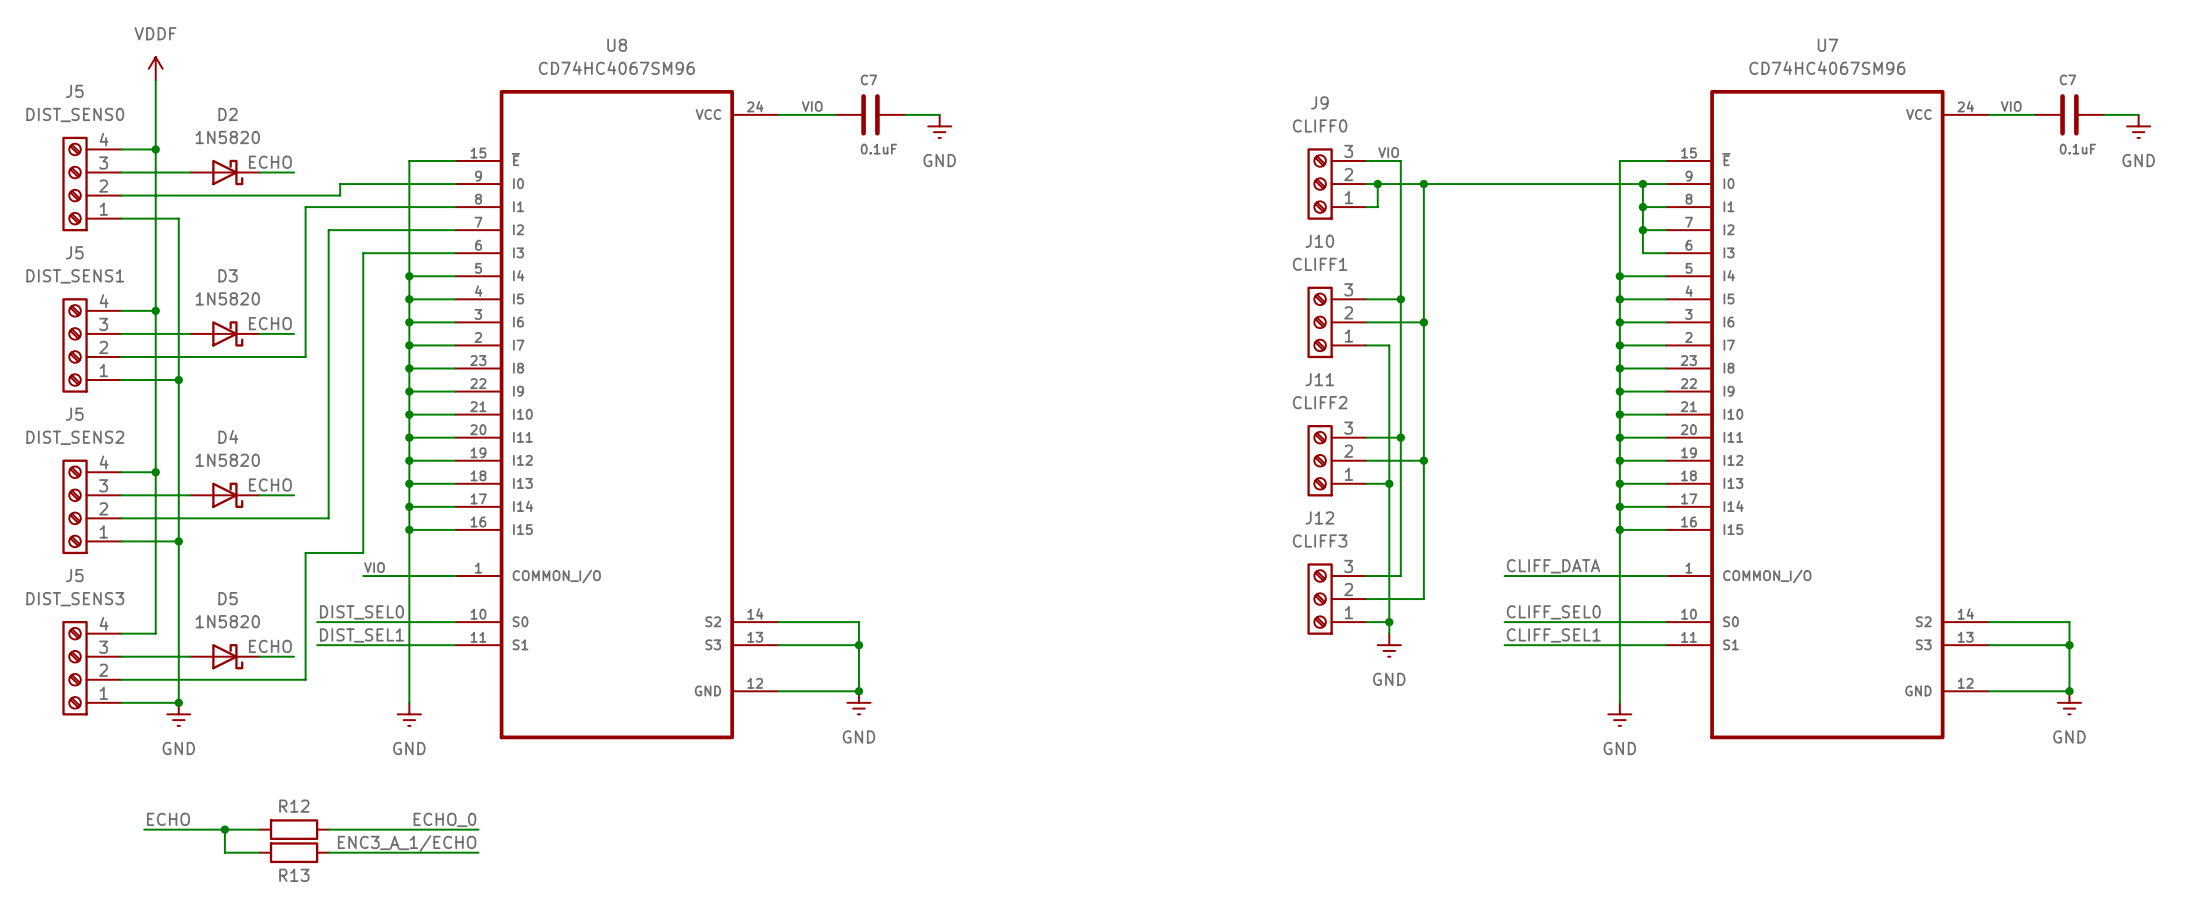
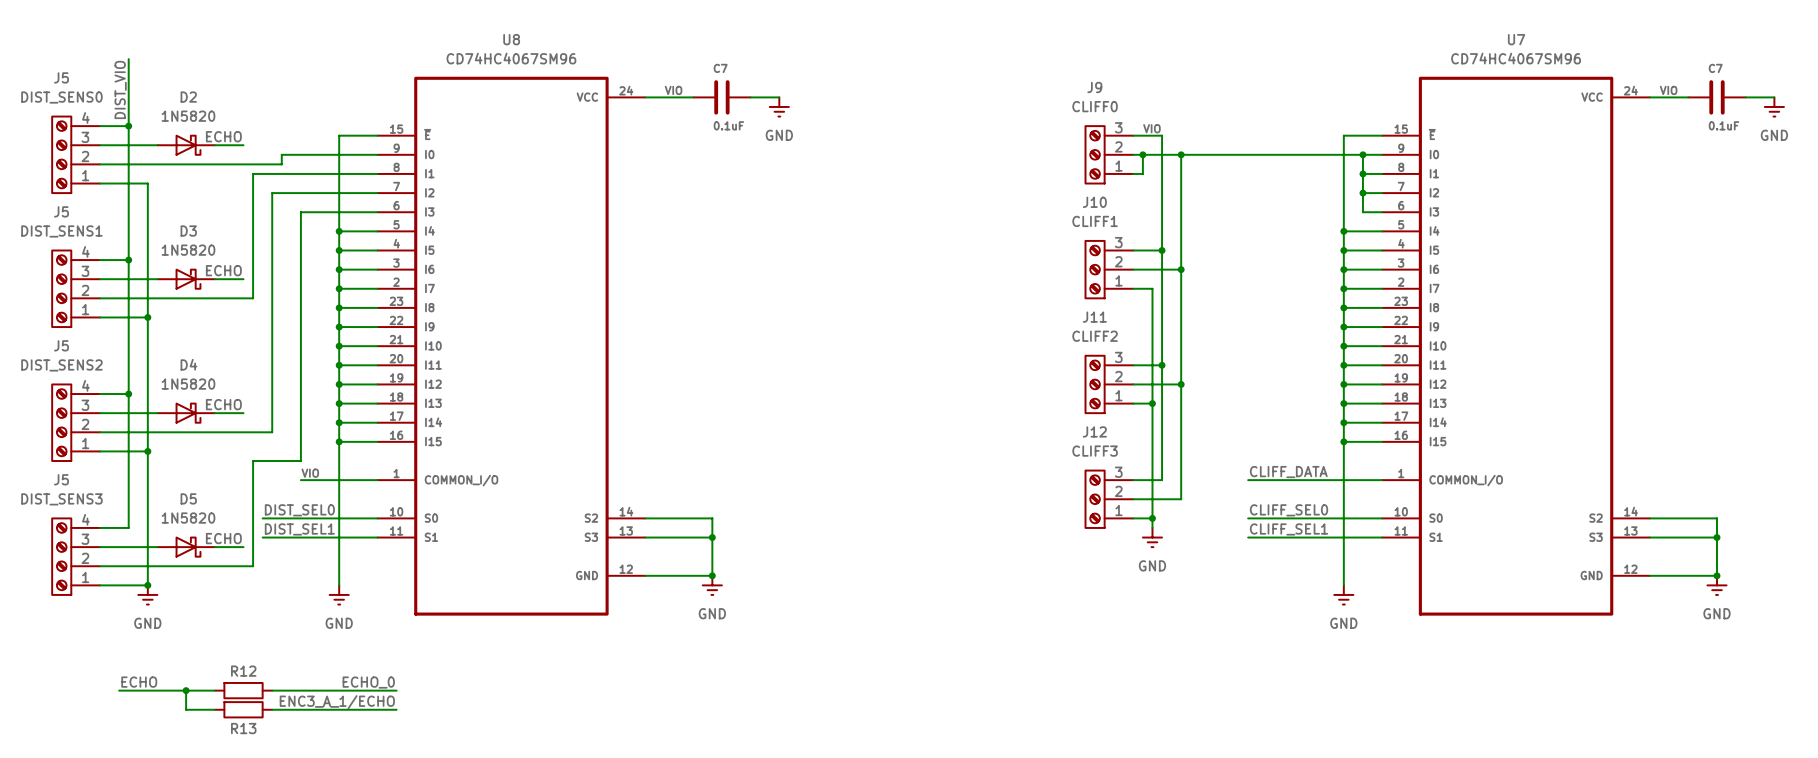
power symbol: VDDF (155, 68) -> none
label: none -> DIST_VIO (120, 89)

